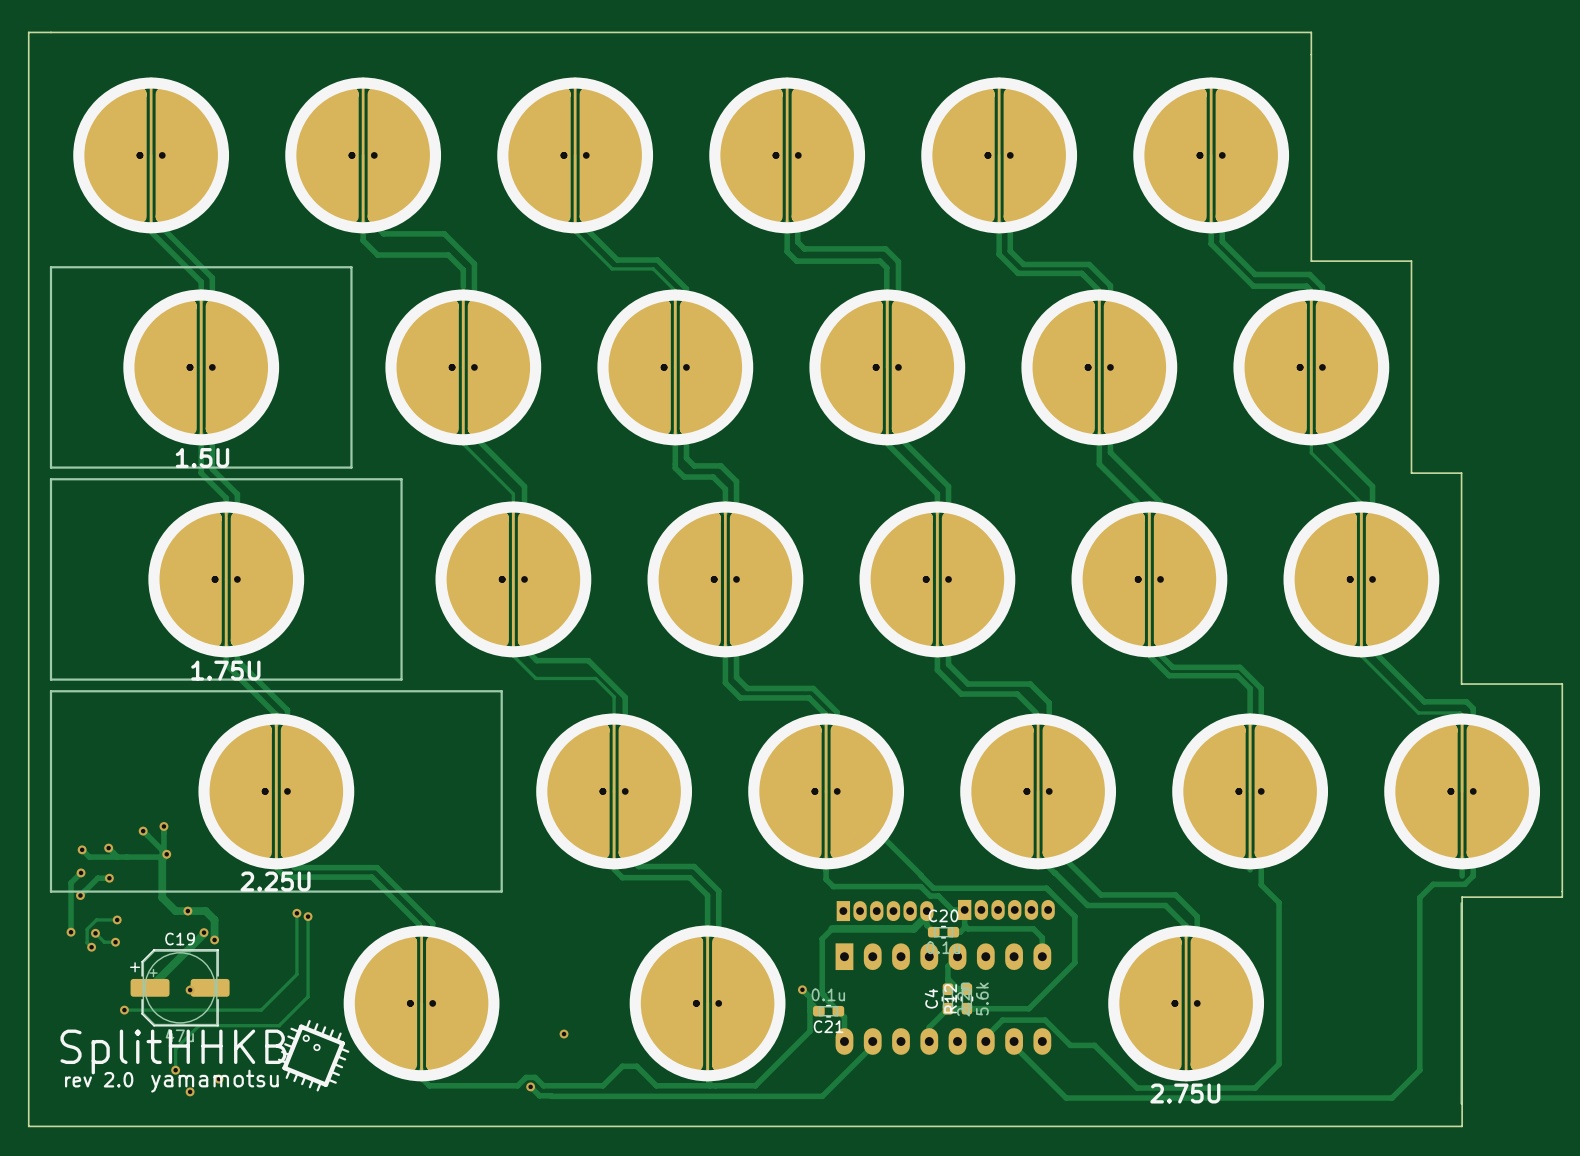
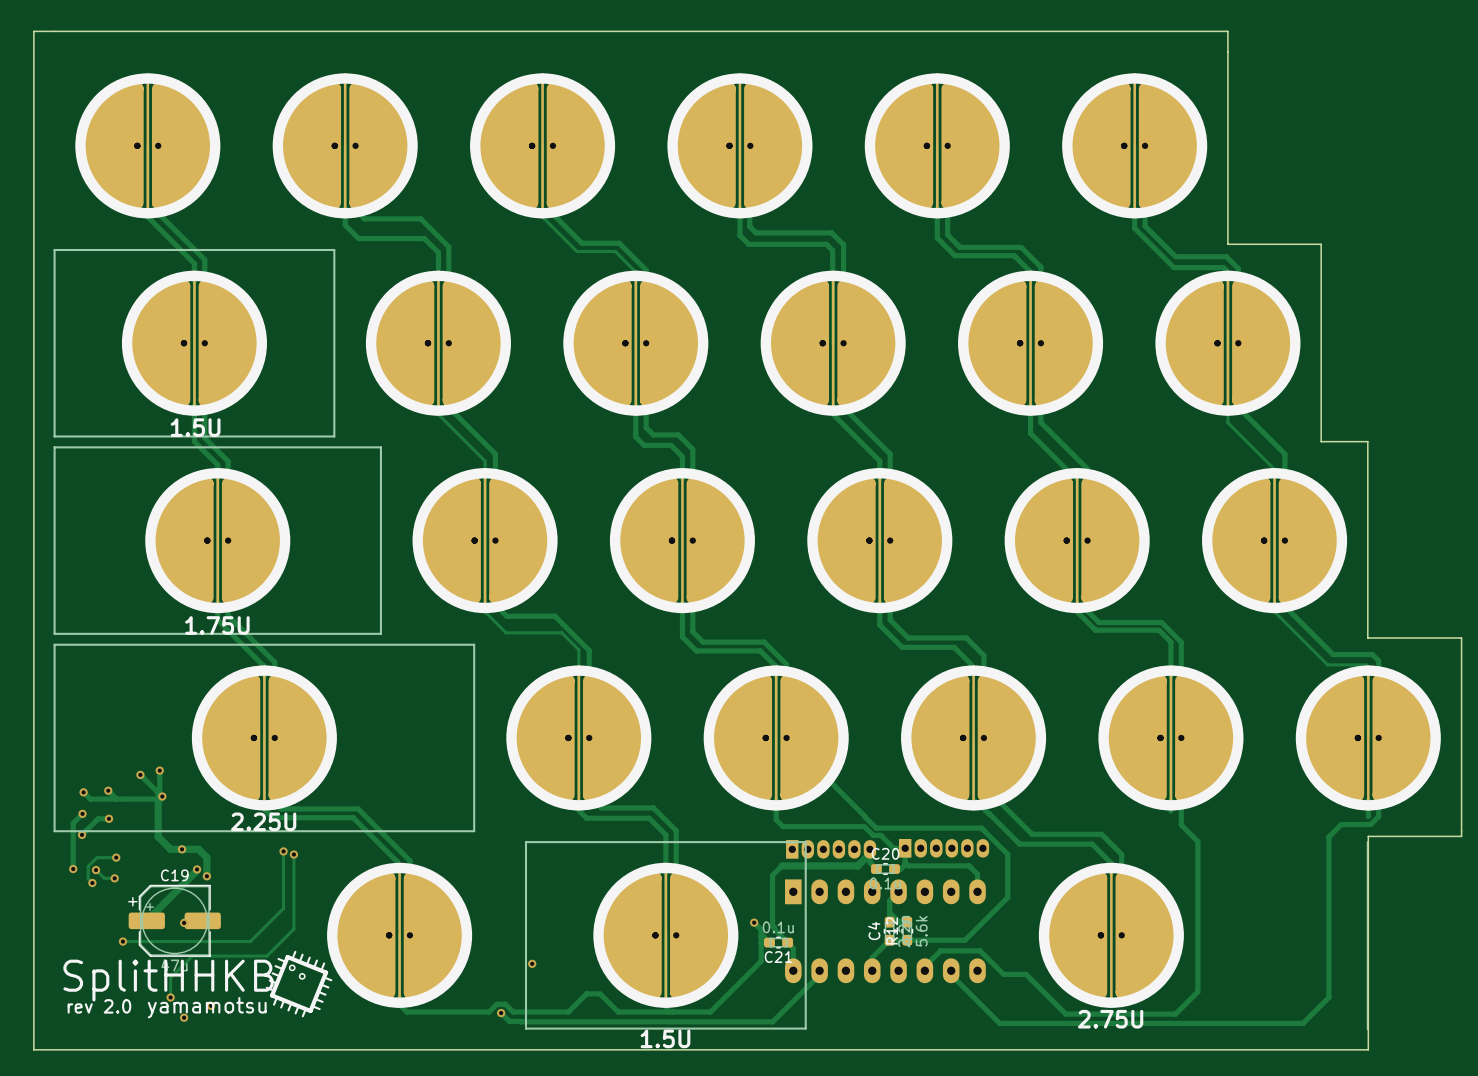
line: none -> (525, 842) (805, 842) (805, 1028) (525, 1028) (525, 842)
text: none -> 1.5U (665, 1038)

